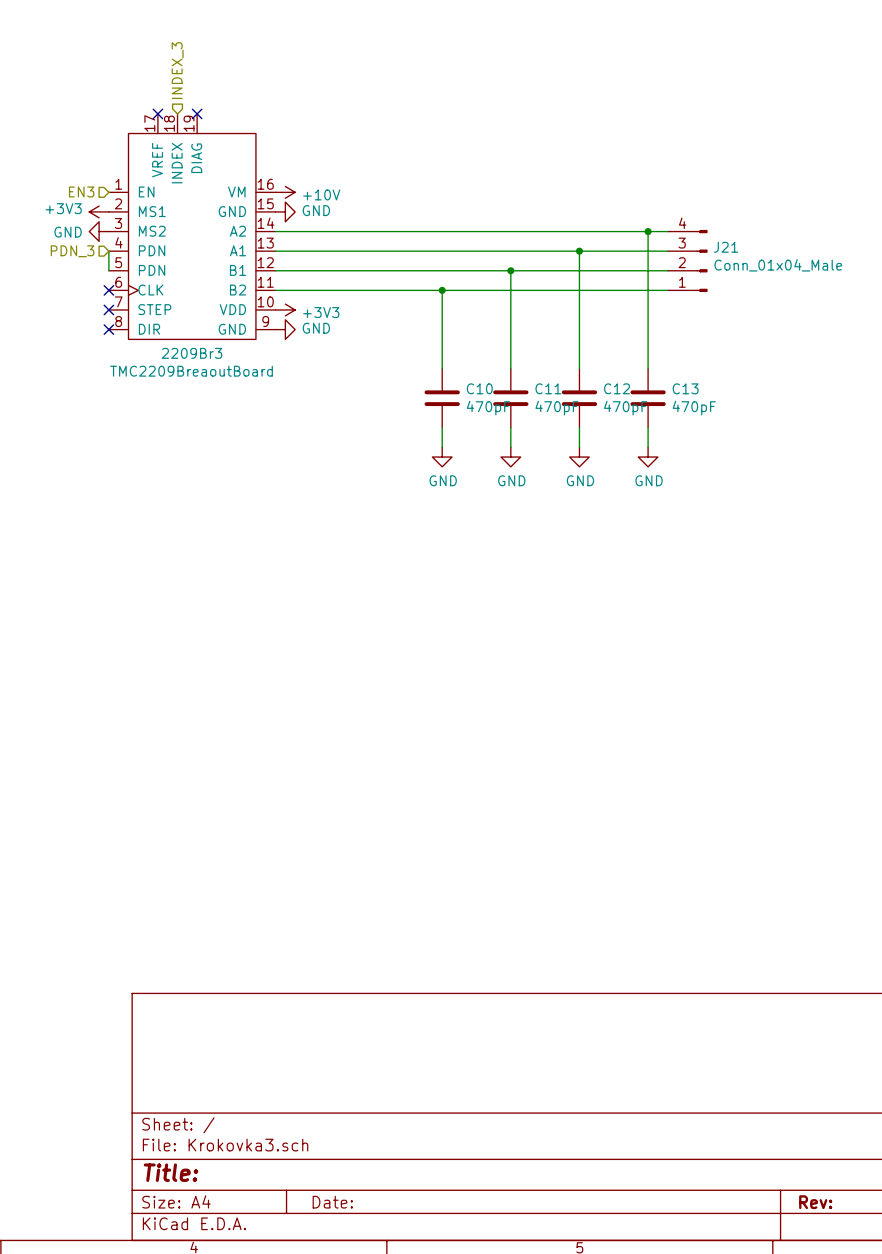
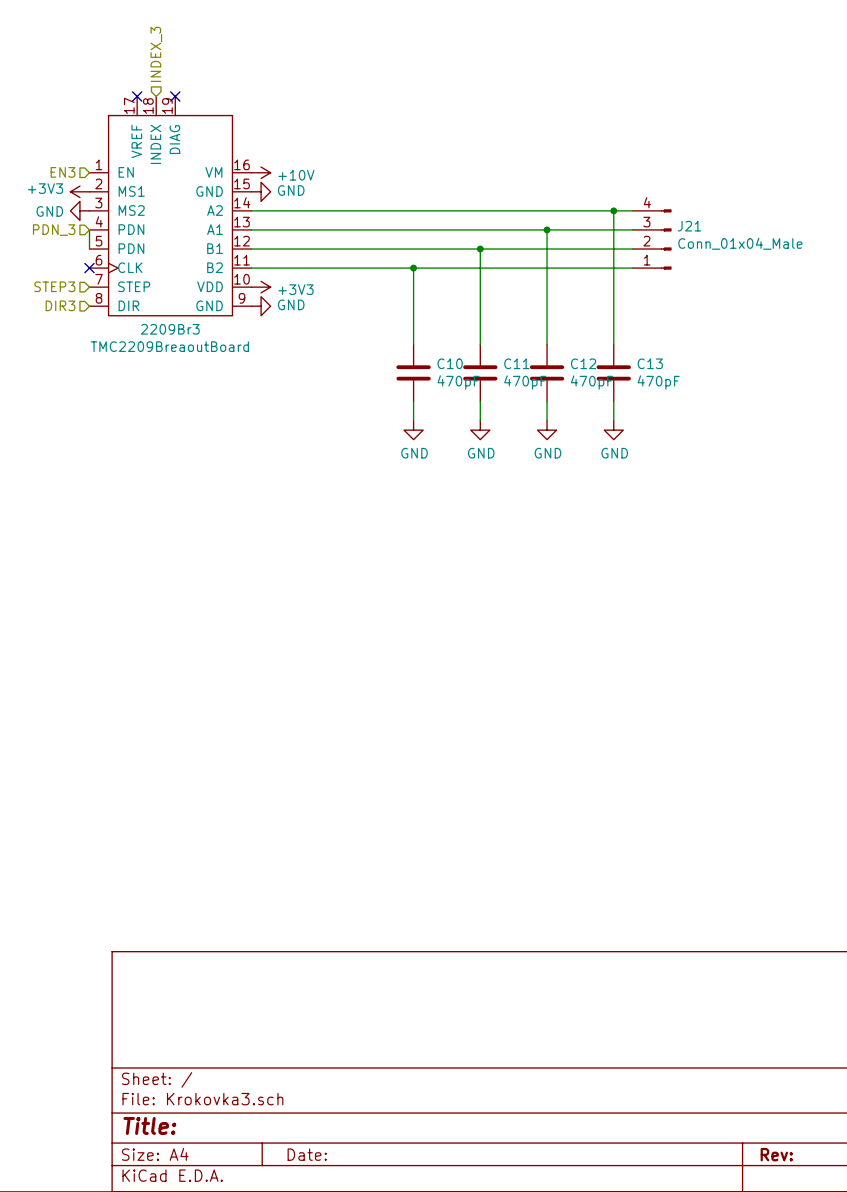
hierarchical label: none -> STEP3 (54, 286)
no-connect mark: (108, 309) -> none
hierarchical label: none -> DIR3 (60, 305)
no-connect mark: (108, 329) -> none

